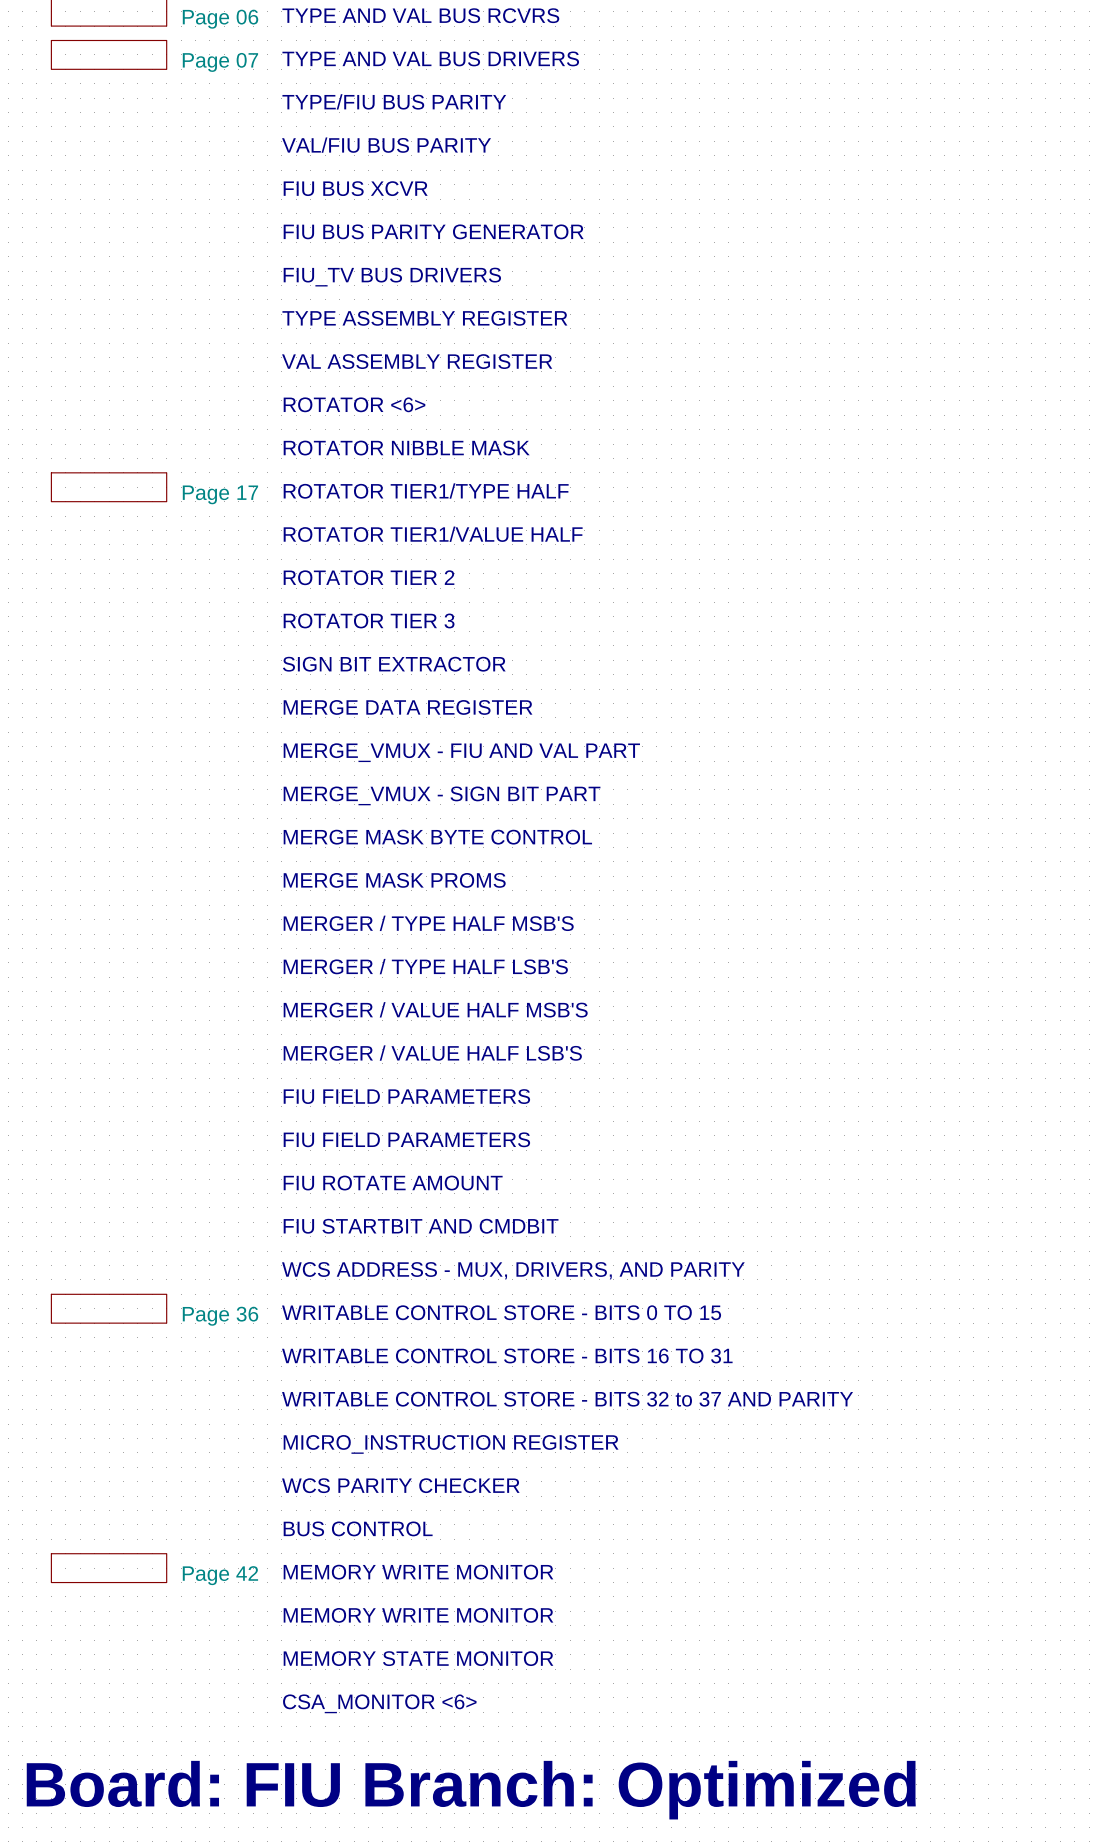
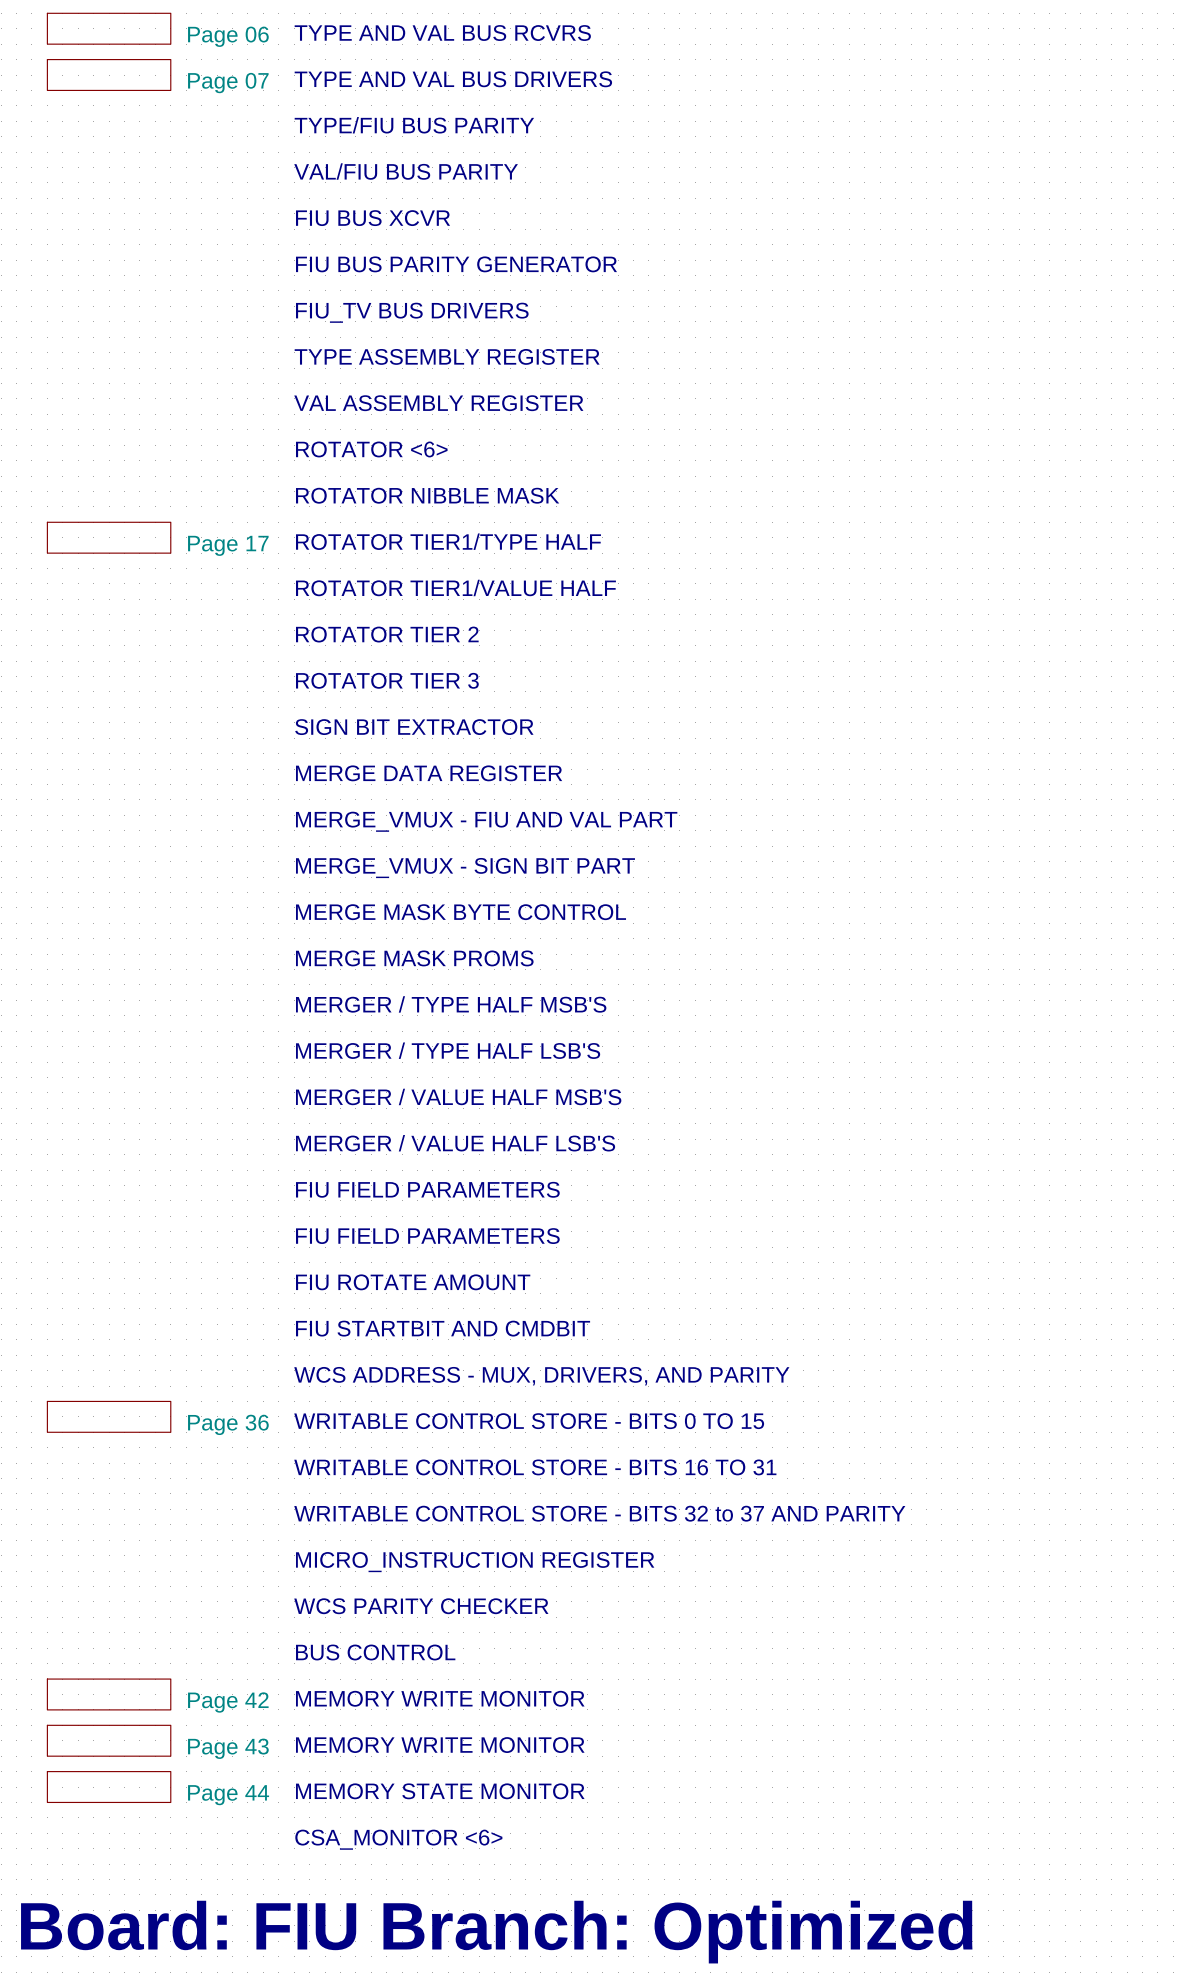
sheet Page 43: none -> (109, 1740)
sheet Page 44: none -> (109, 1787)

